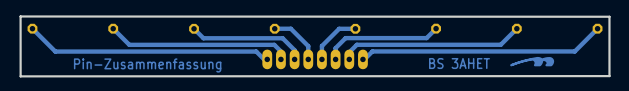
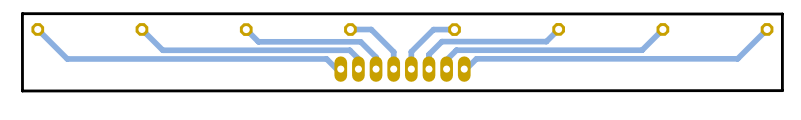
drawing: [510, 56, 555, 67] -> none
text: BS 3AHET (459, 63) -> none
text: Pin-Zusammenfassung (147, 65) -> none

